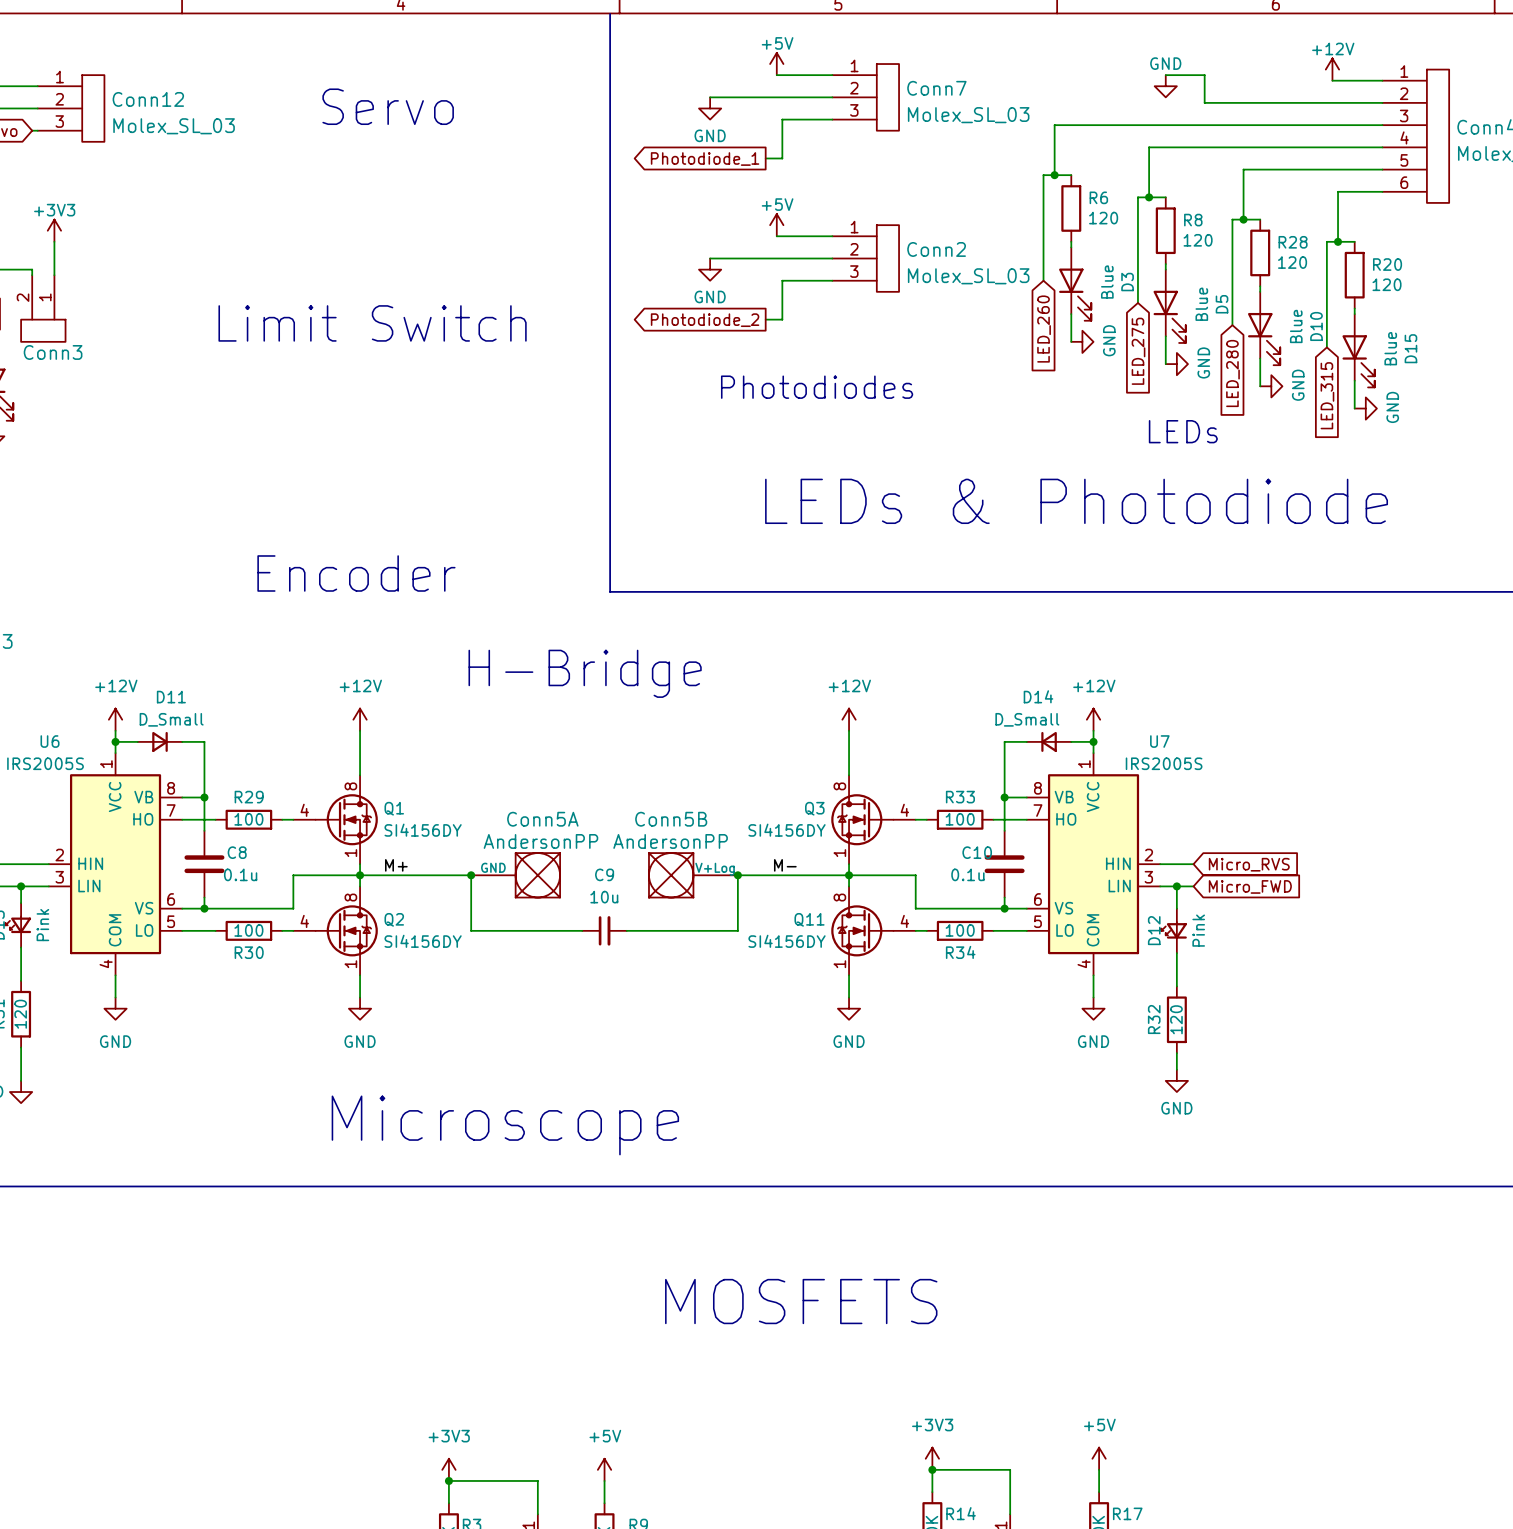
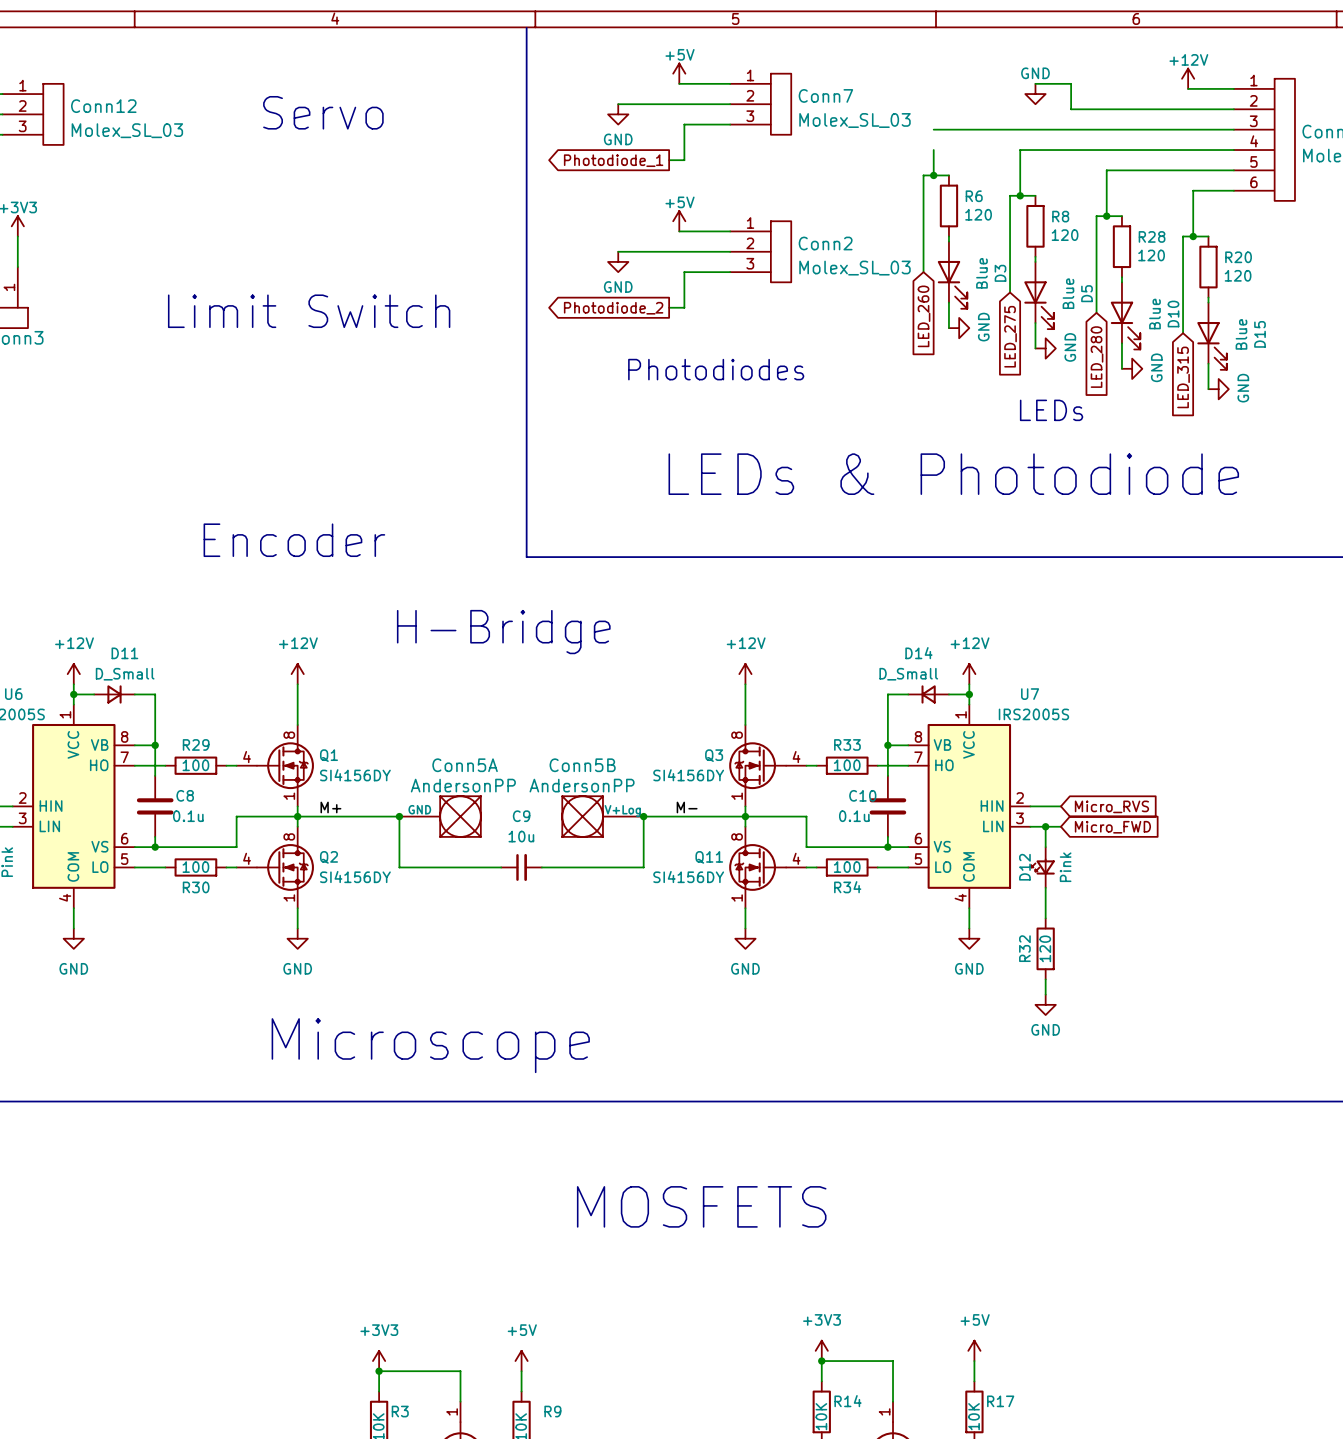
wire: (1054, 125) (1054, 147) -> none

